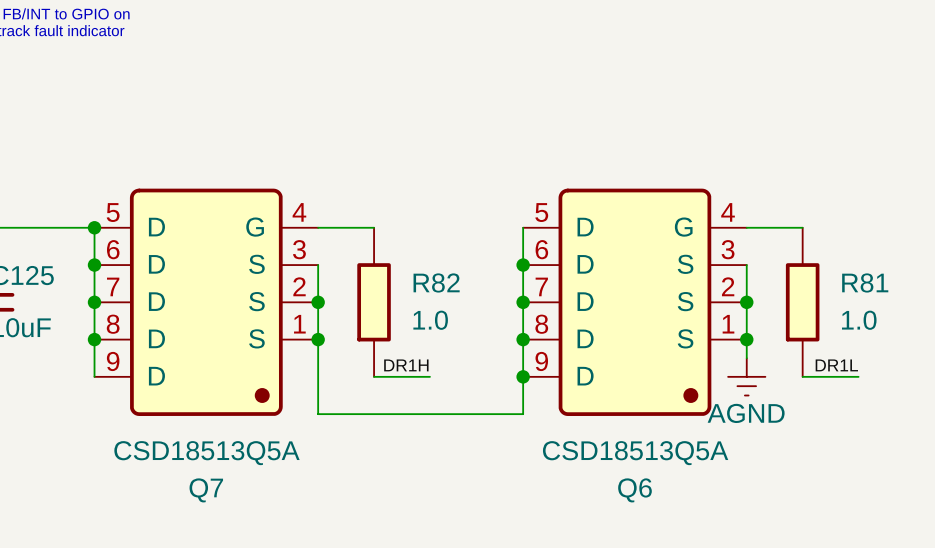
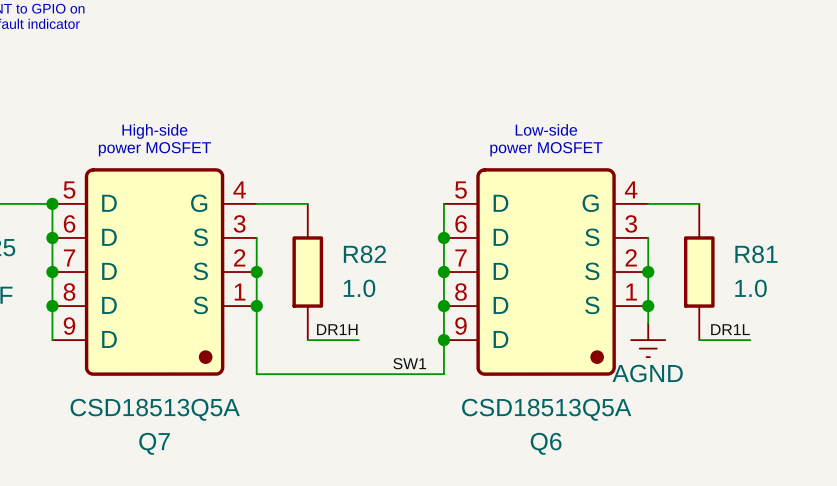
text: none -> Low-side (546, 129)
text: none -> High-side (154, 131)
text: none -> power MOSFET (154, 149)
text: none -> power MOSFET (546, 149)
label: none -> SW1 (409, 363)

